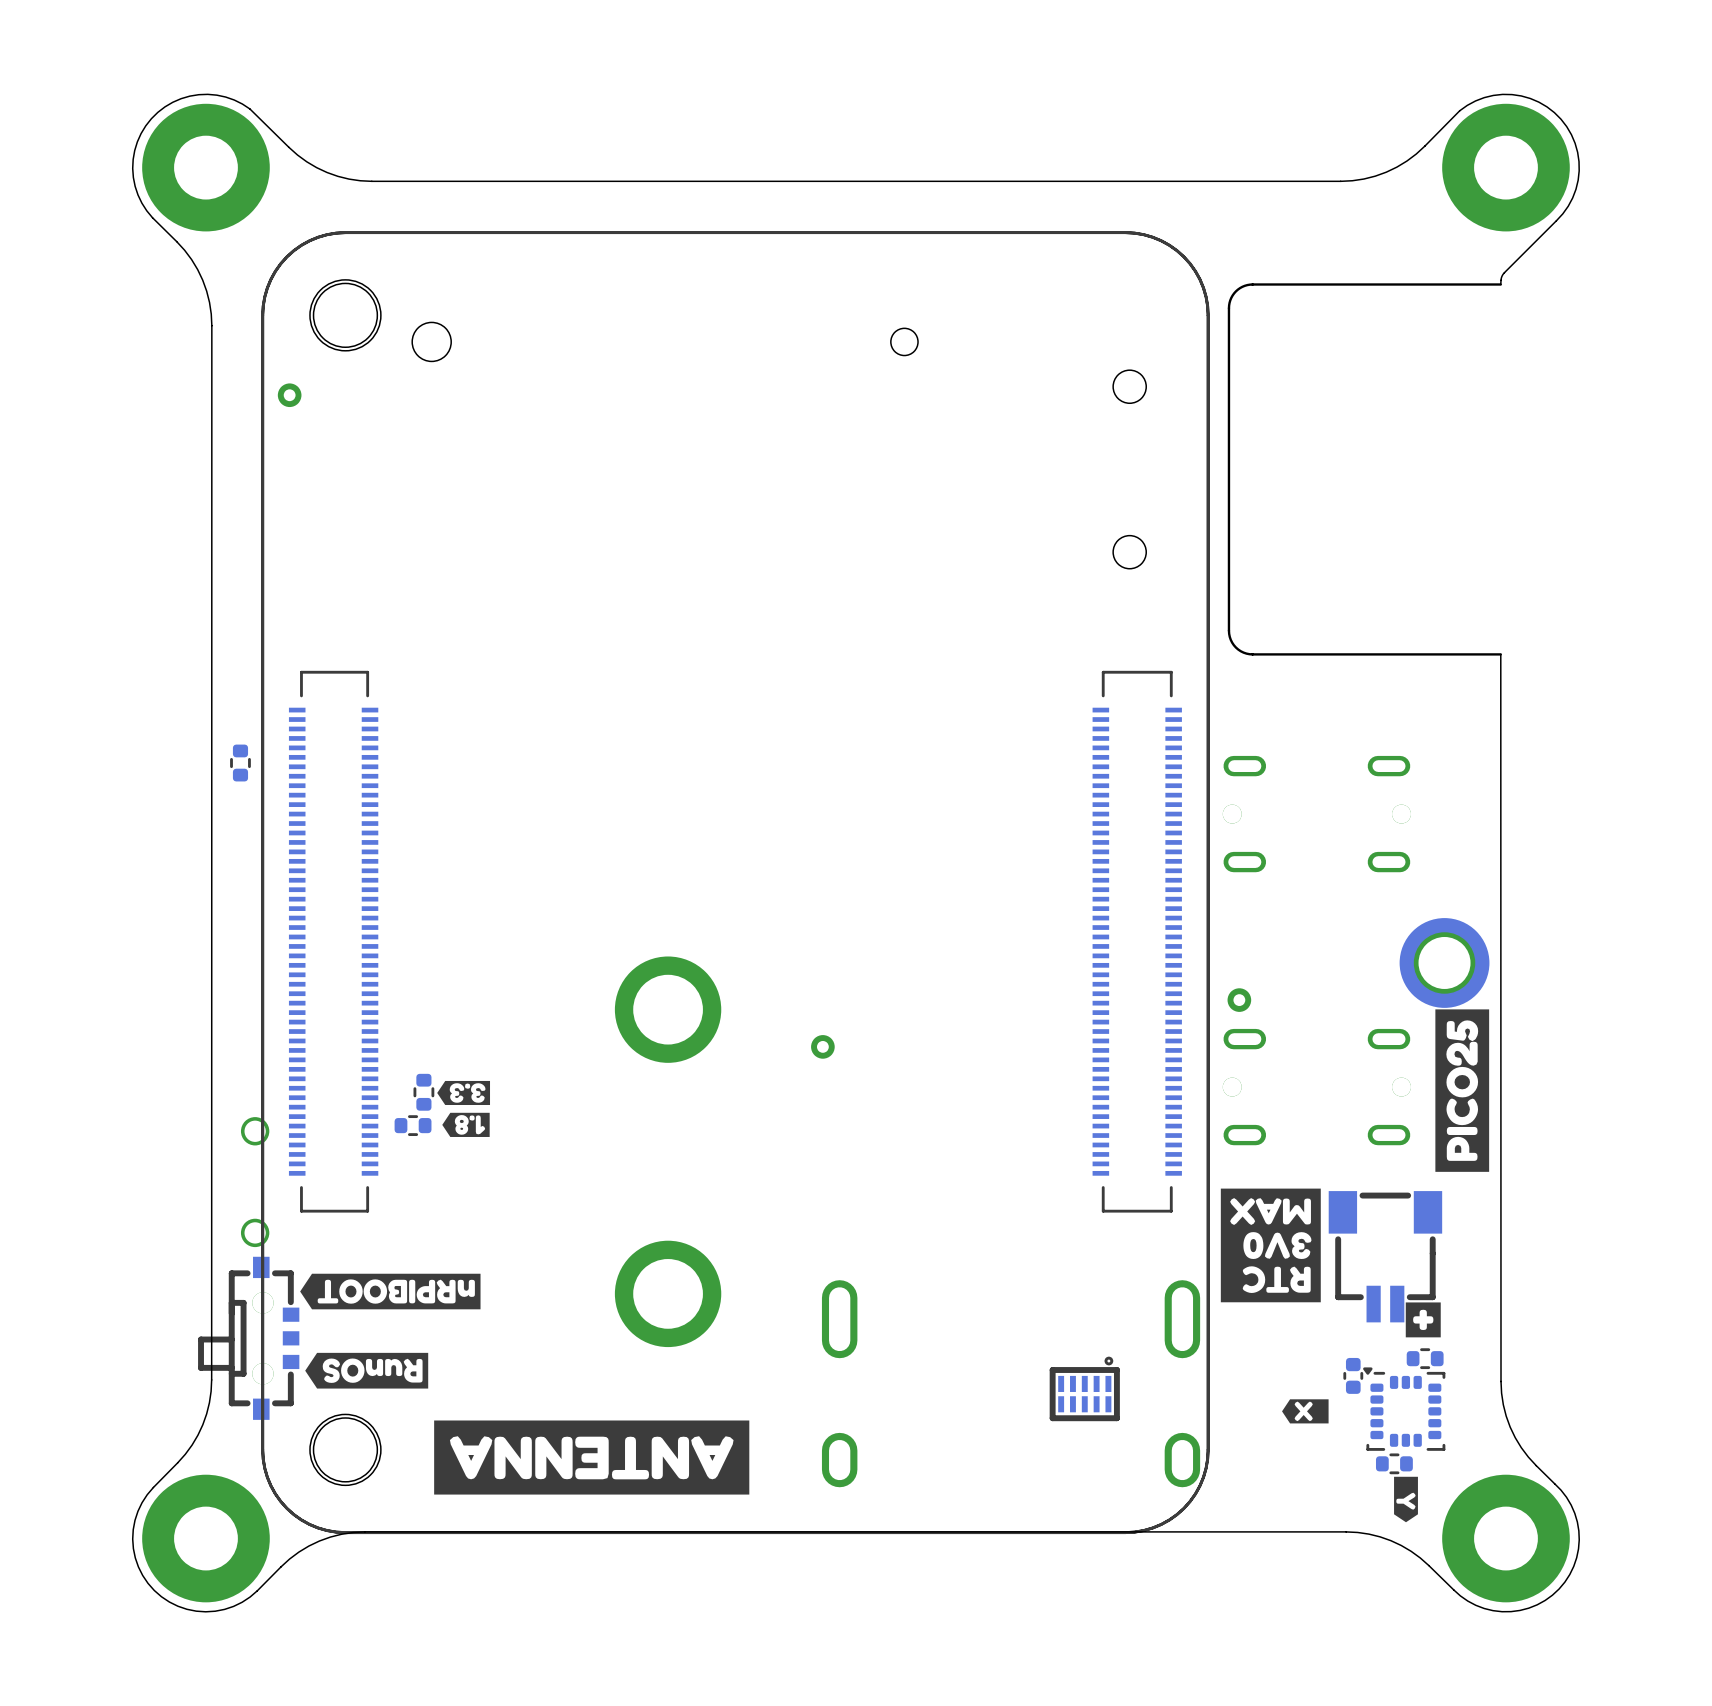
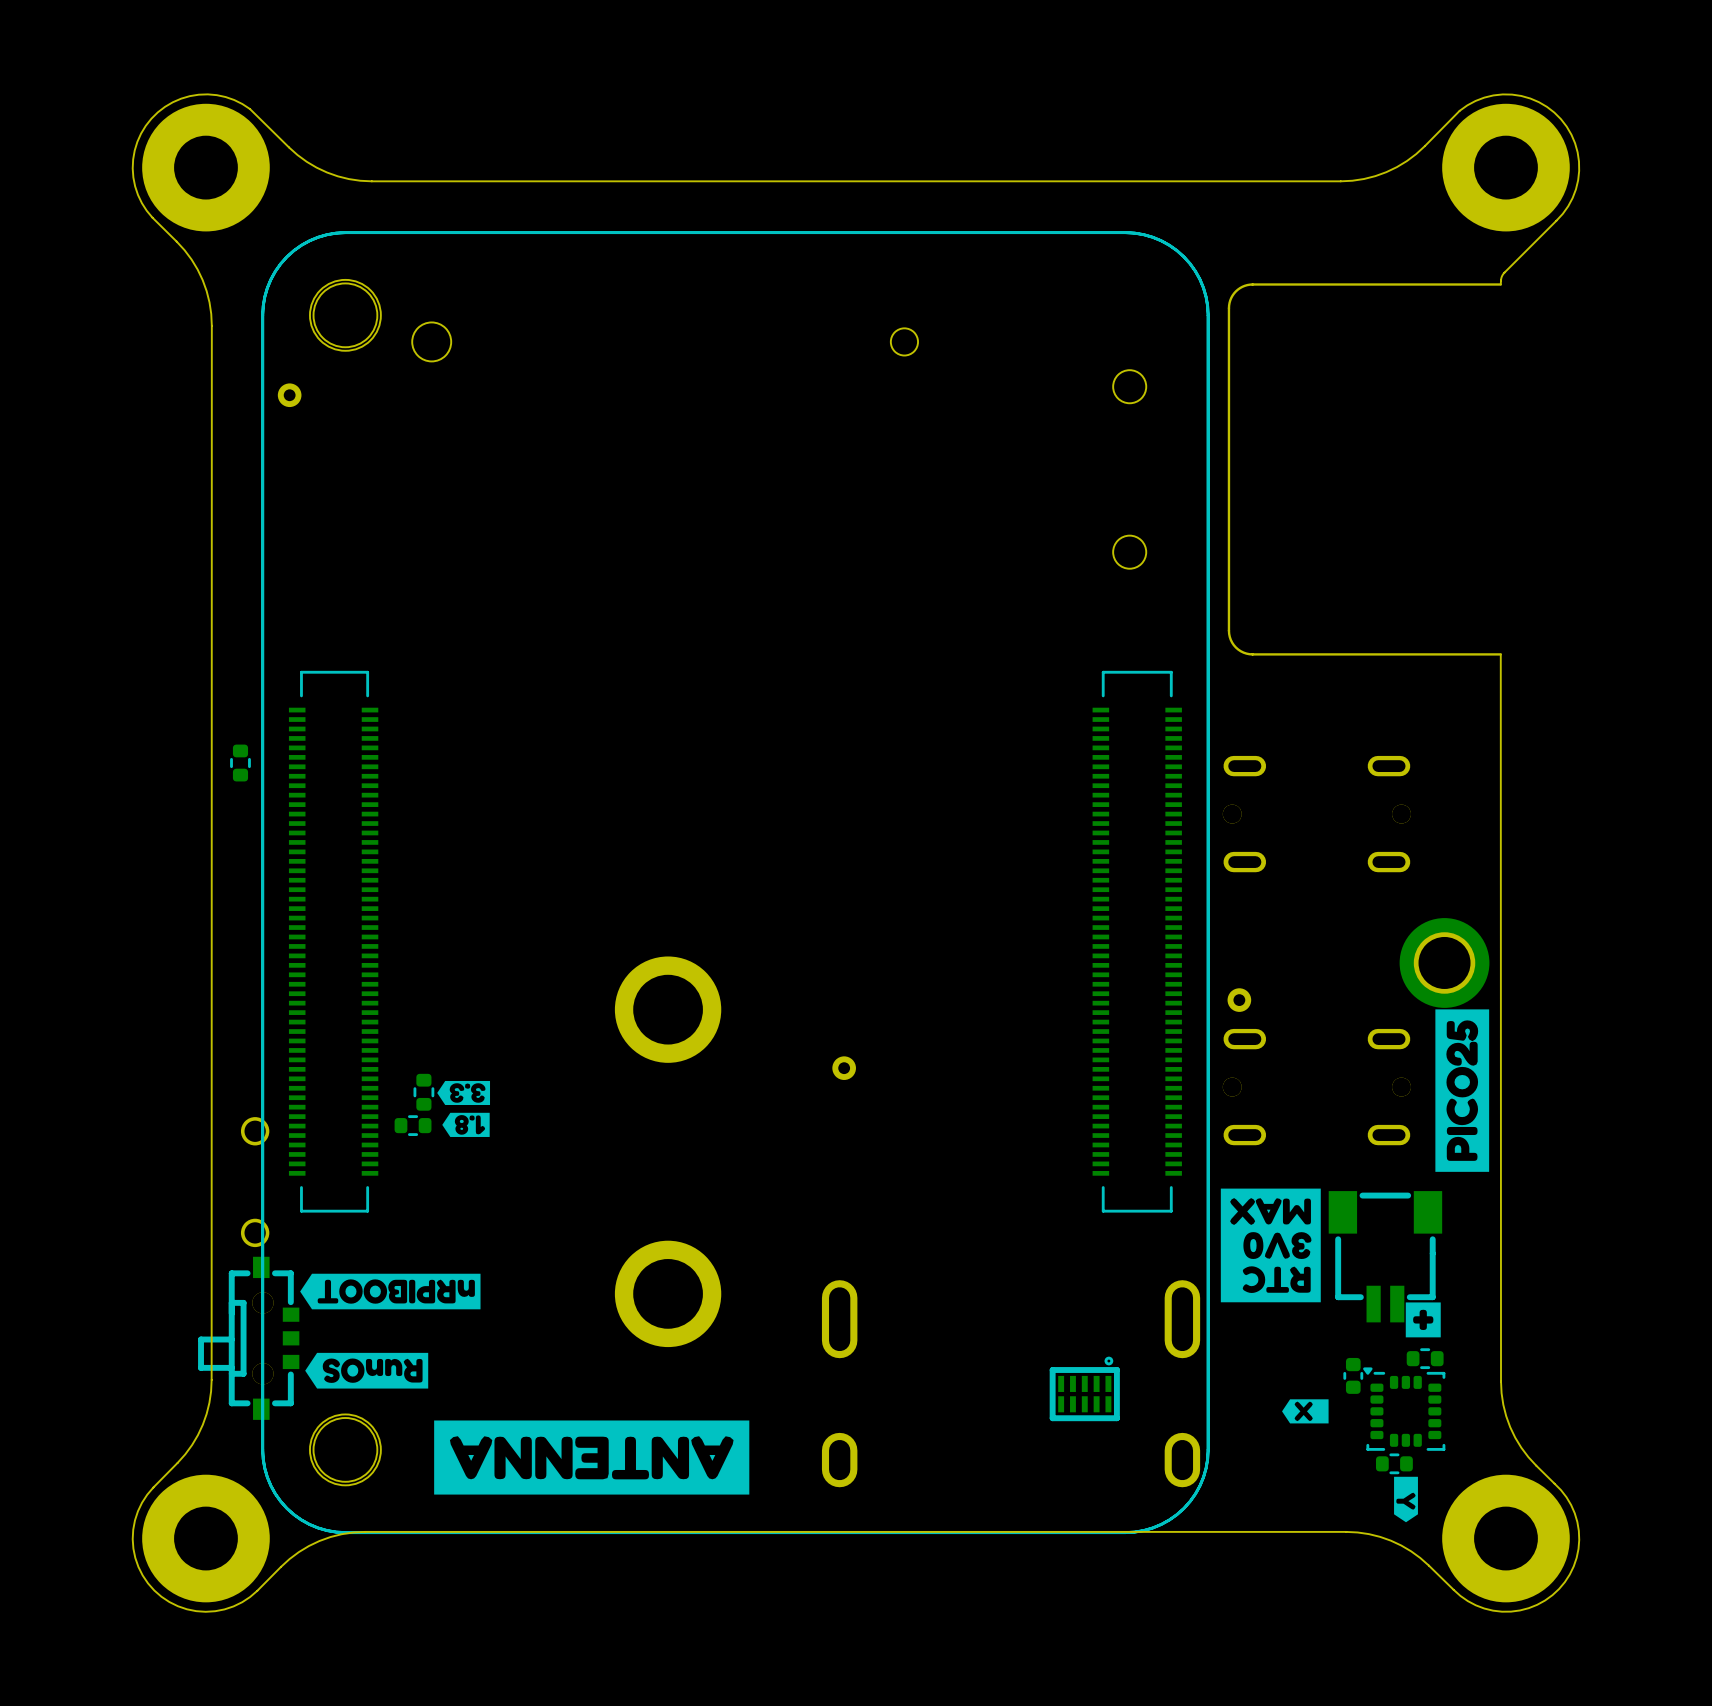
part position: (822, 1046) -> (844, 1068)

